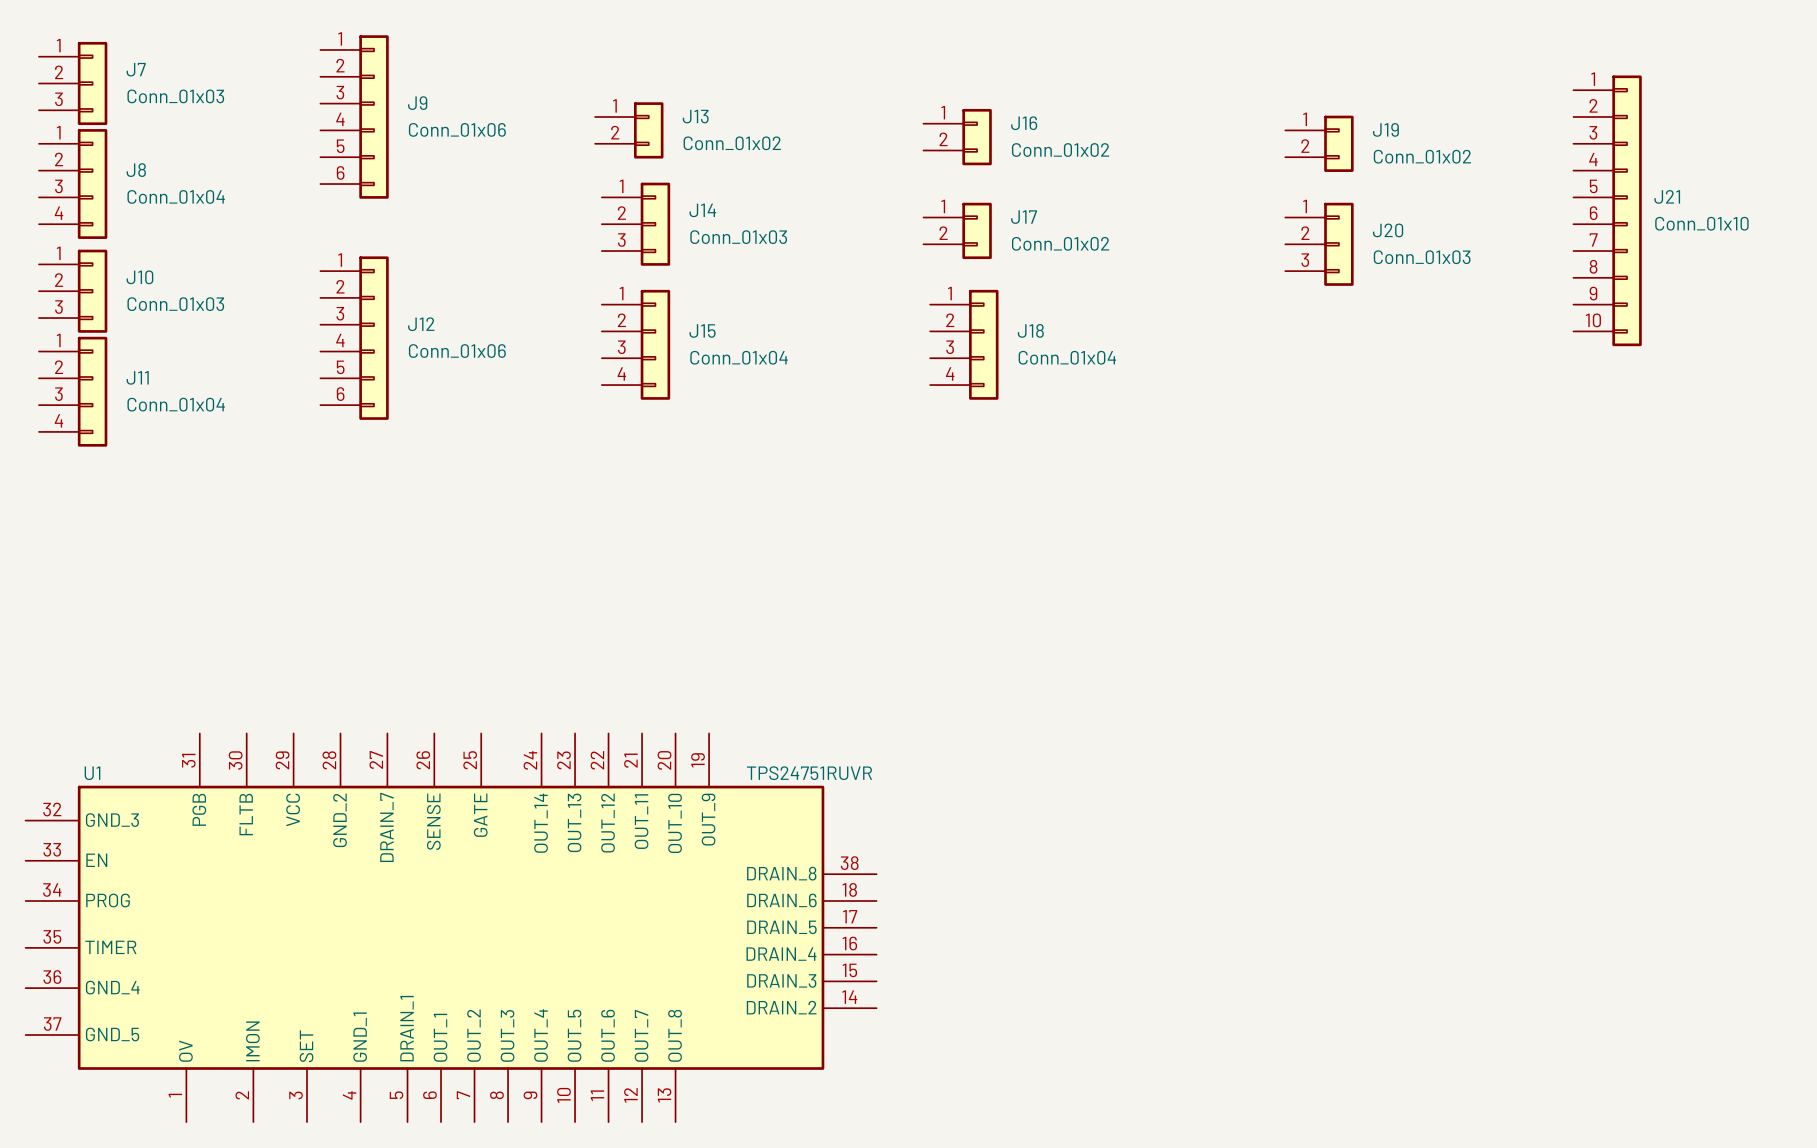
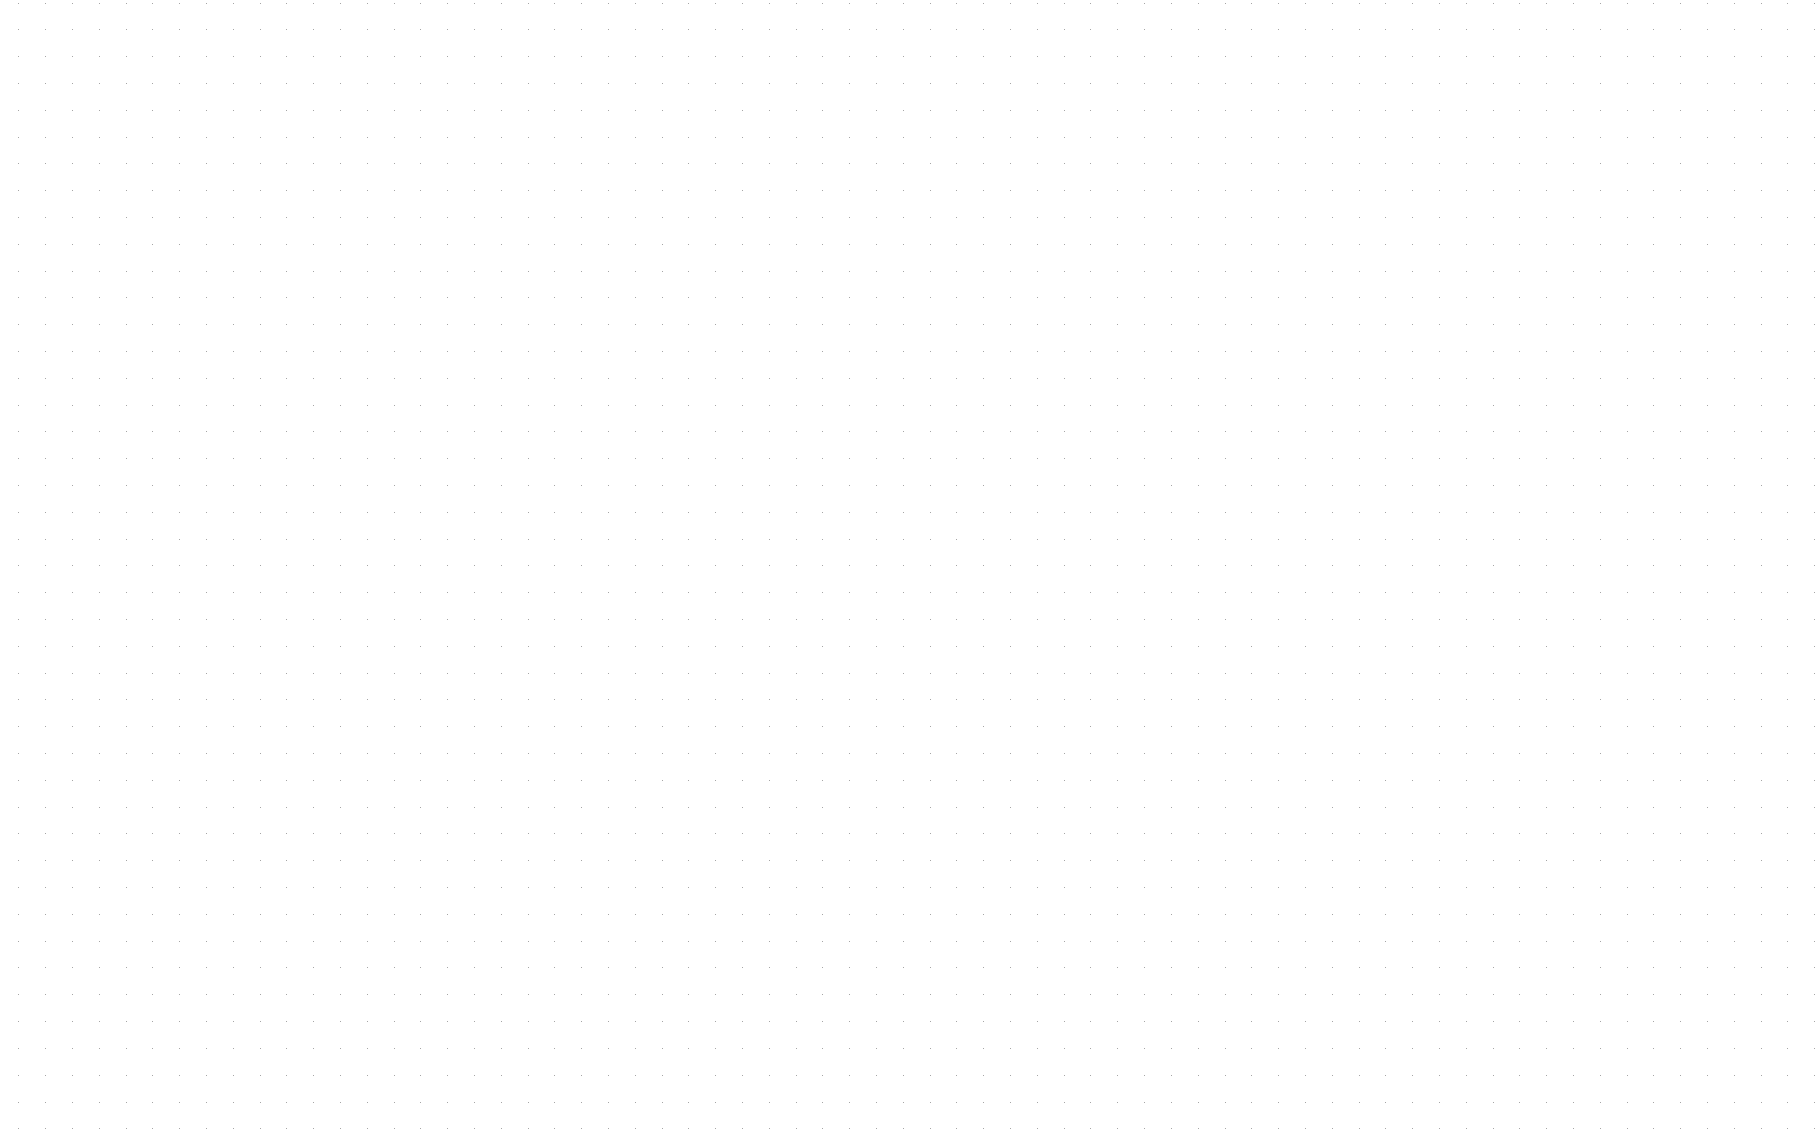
J7: Conn_01x03 (73, 83) -> none
J9: Conn_01x06 (354, 117) -> none
J13: Conn_01x02 (629, 130) -> none
J16: Conn_01x02 (957, 137) -> none
J19: Conn_01x02 (1319, 143) -> none
J8: Conn_01x04 (73, 184) -> none
J21: Conn_01x10 (1607, 210) -> none
J14: Conn_01x03 (636, 224) -> none
J17: Conn_01x02 (957, 230) -> none
J20: Conn_01x03 (1319, 244) -> none
J10: Conn_01x03 (73, 291) -> none
J12: Conn_01x06 (354, 338) -> none
J15: Conn_01x04 (636, 344) -> none
J18: Conn_01x04 (964, 344) -> none
J11: Conn_01x04 (73, 391) -> none
U1: TPS24751RUVR (451, 927) -> none

